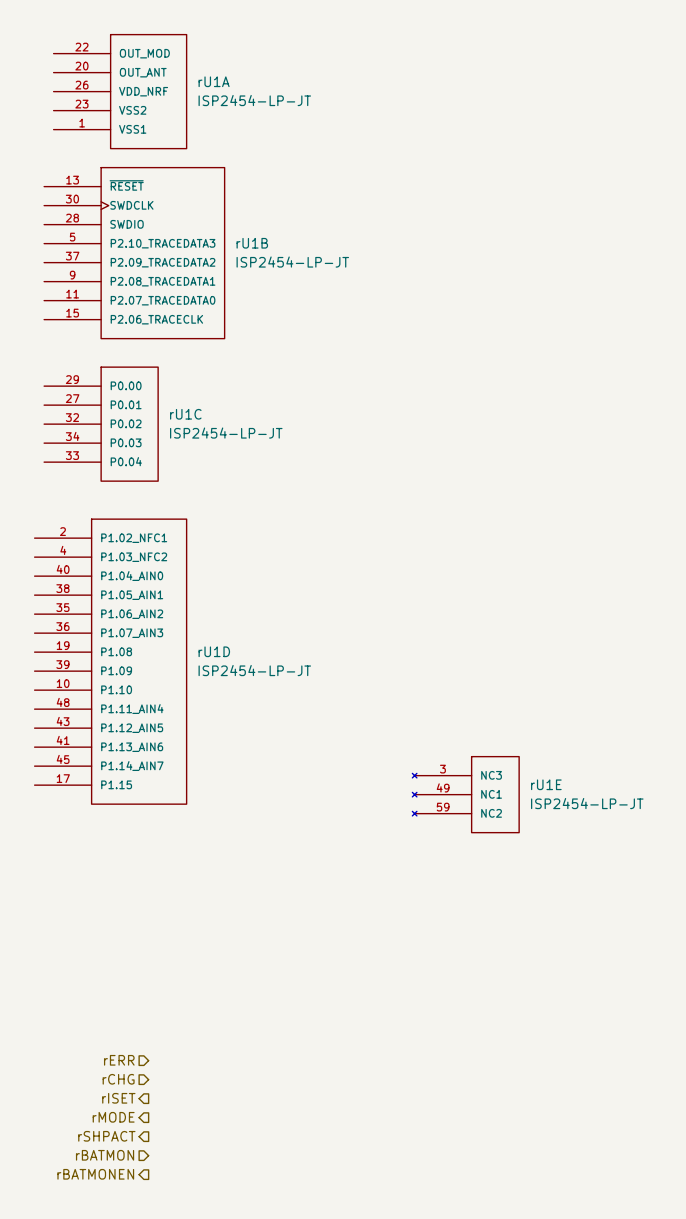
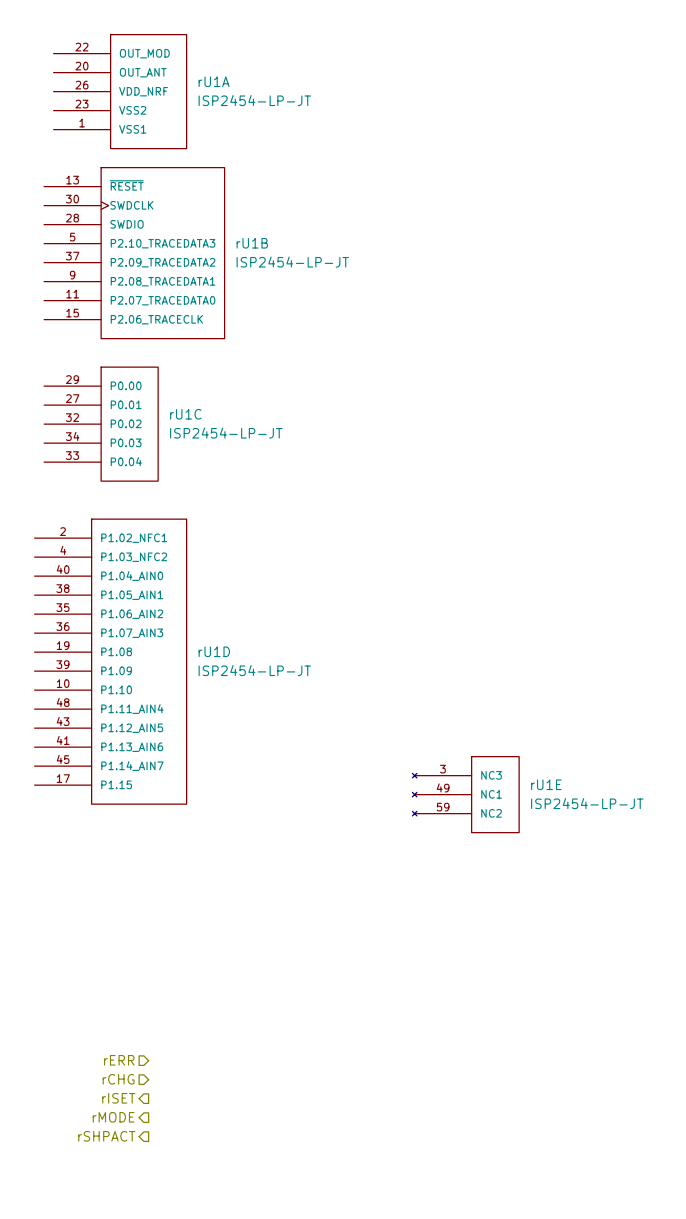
hierarchical label: rBATMON (105, 1155) -> none
hierarchical label: rBATMONEN (95, 1174) -> none

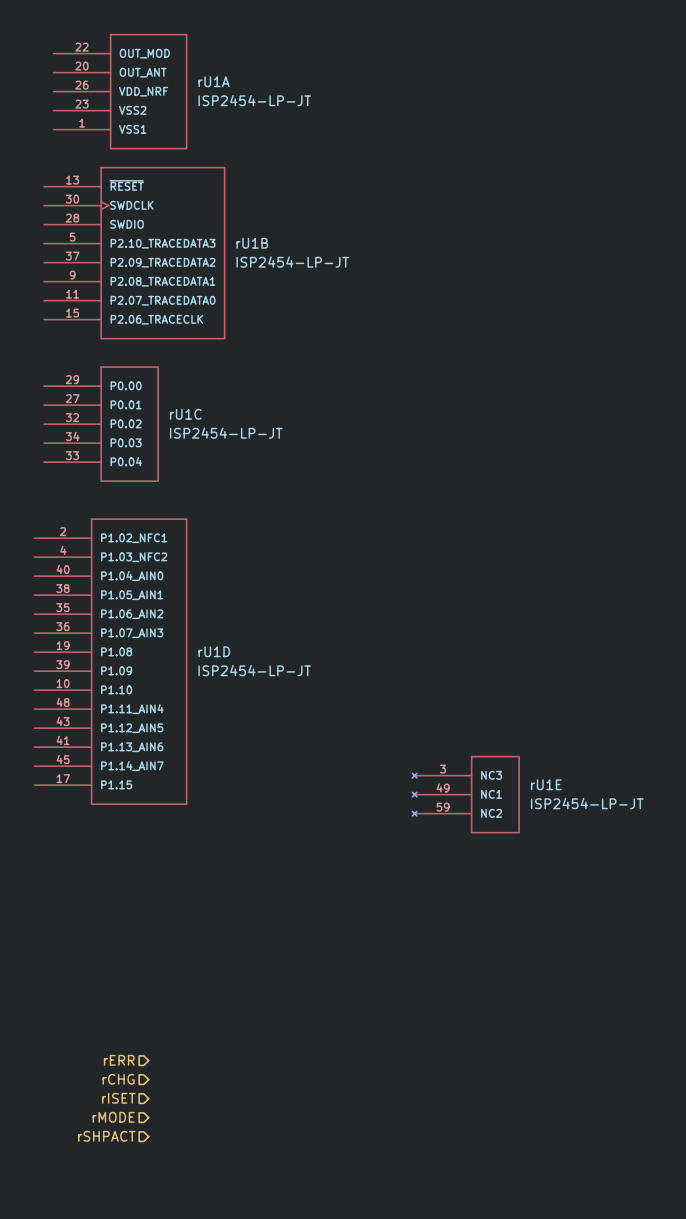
hierarchical label shape: output (118, 1098) -> input (118, 1098)
hierarchical label shape: output (113, 1117) -> input (113, 1117)
hierarchical label shape: output (106, 1136) -> input (106, 1136)

